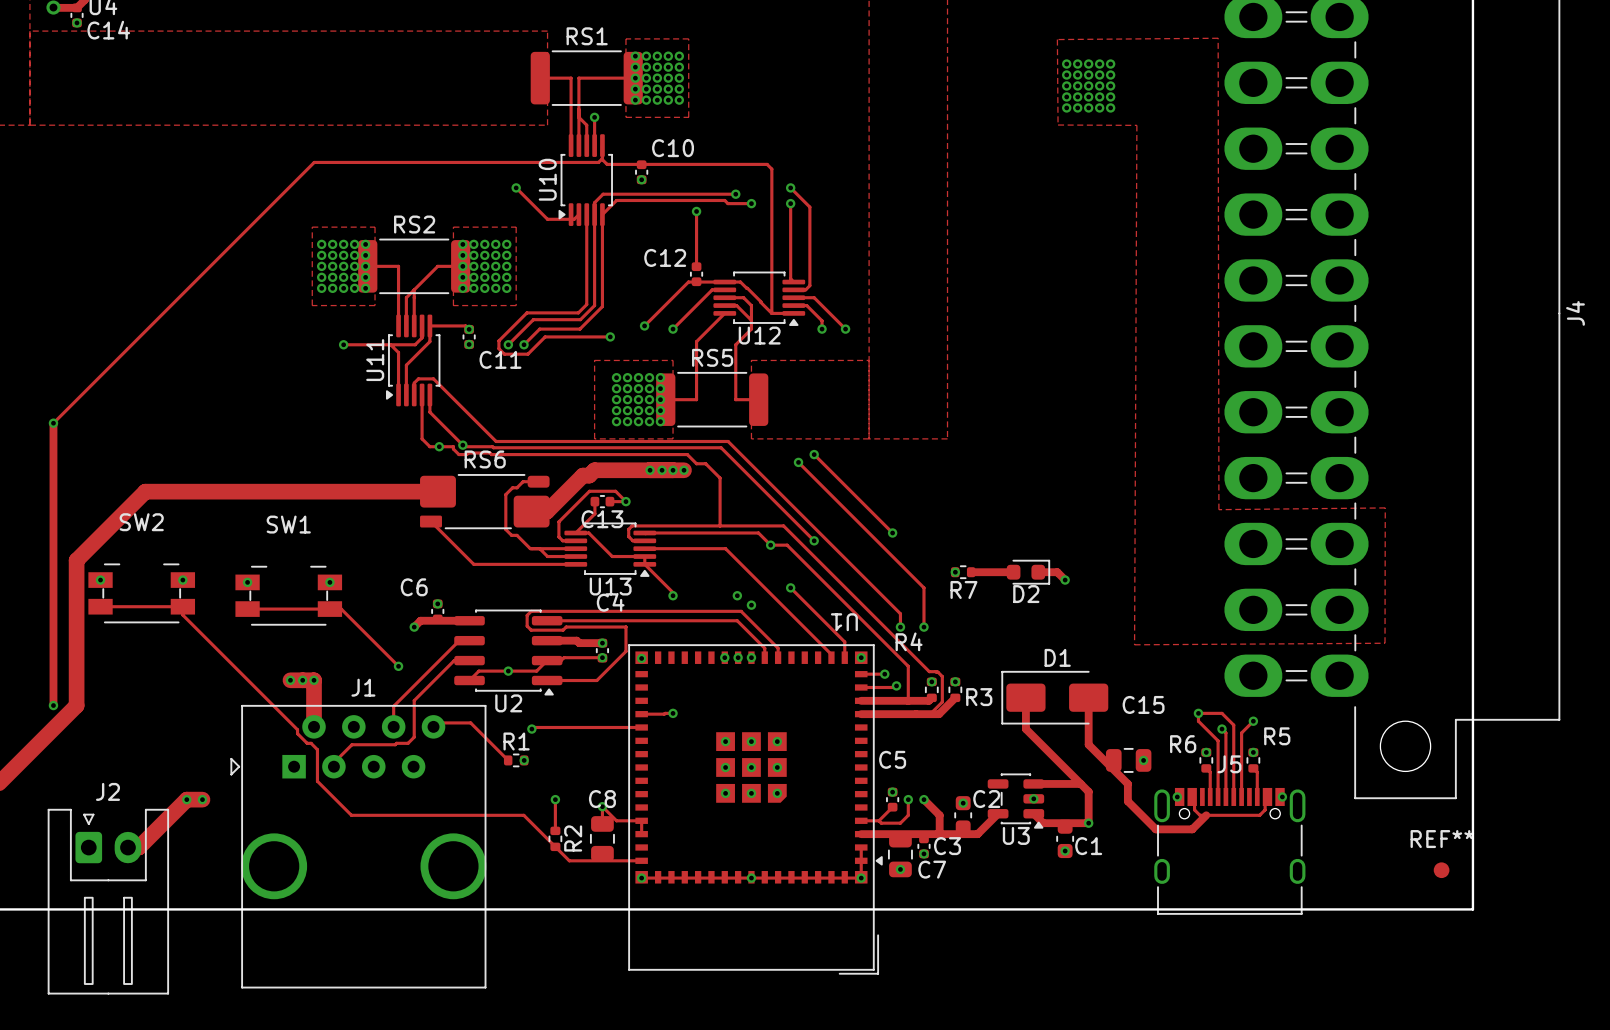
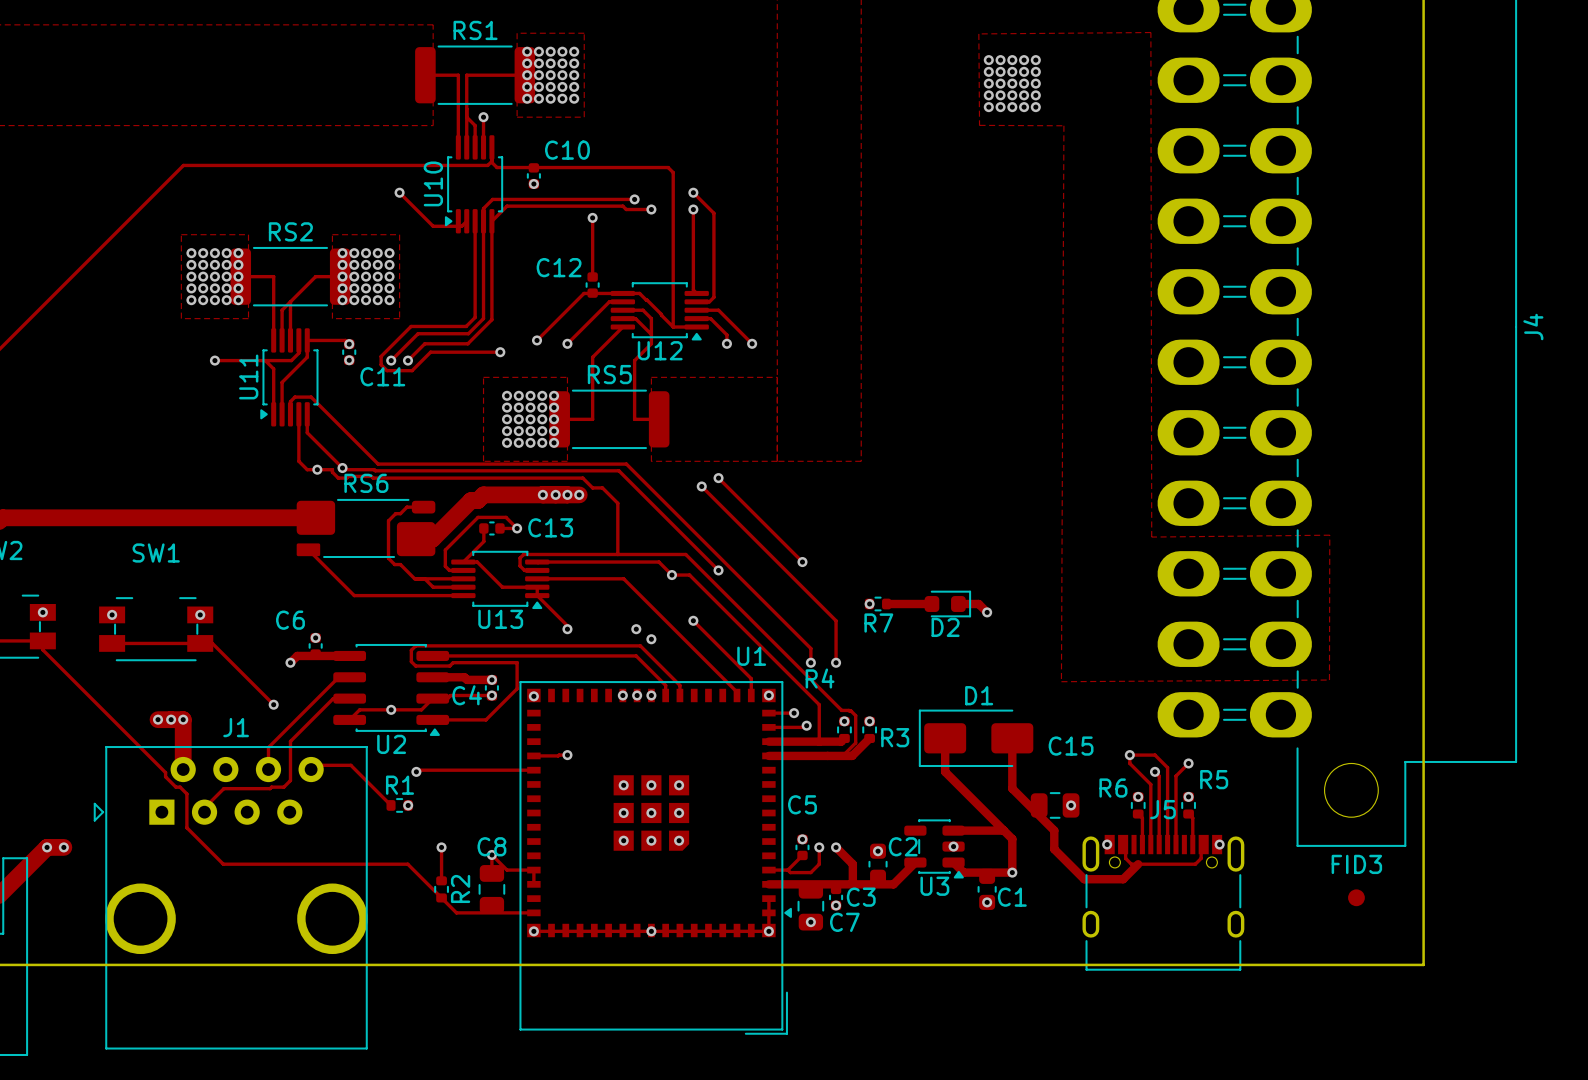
C13 name position: C13 (602, 519) -> C13 (550, 527)
C4 name position: C4 (610, 602) -> C4 (467, 695)
U1 name rotation: 0° (844, 622) -> 180° (751, 656)
FID3: none -> (1356, 897)
REF**: (1441, 870) -> none

